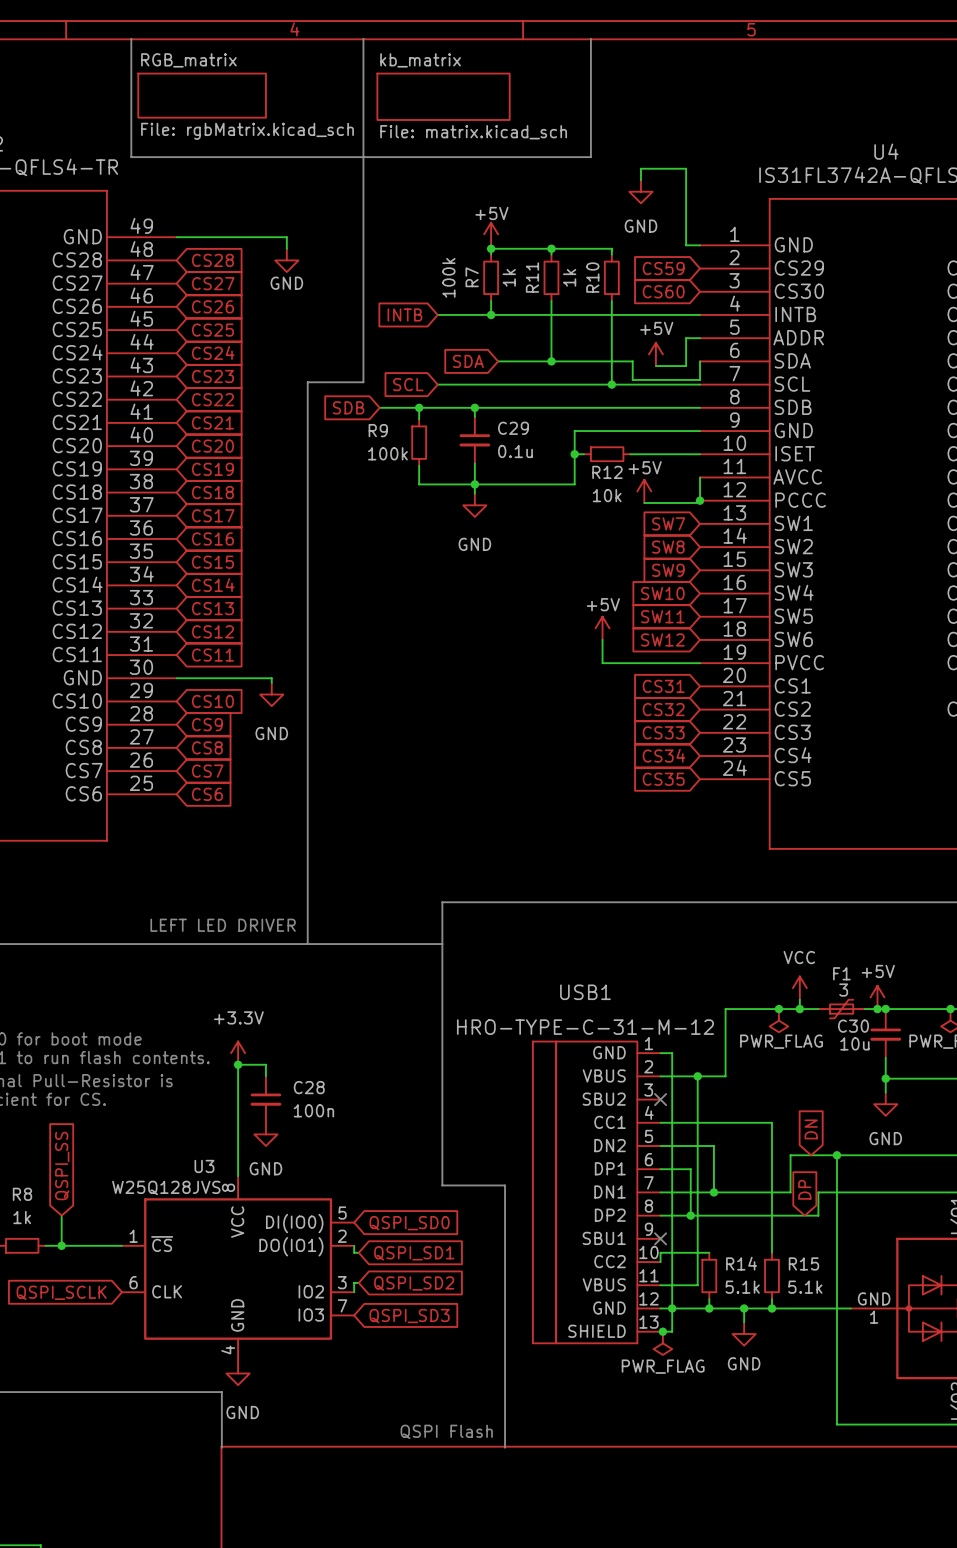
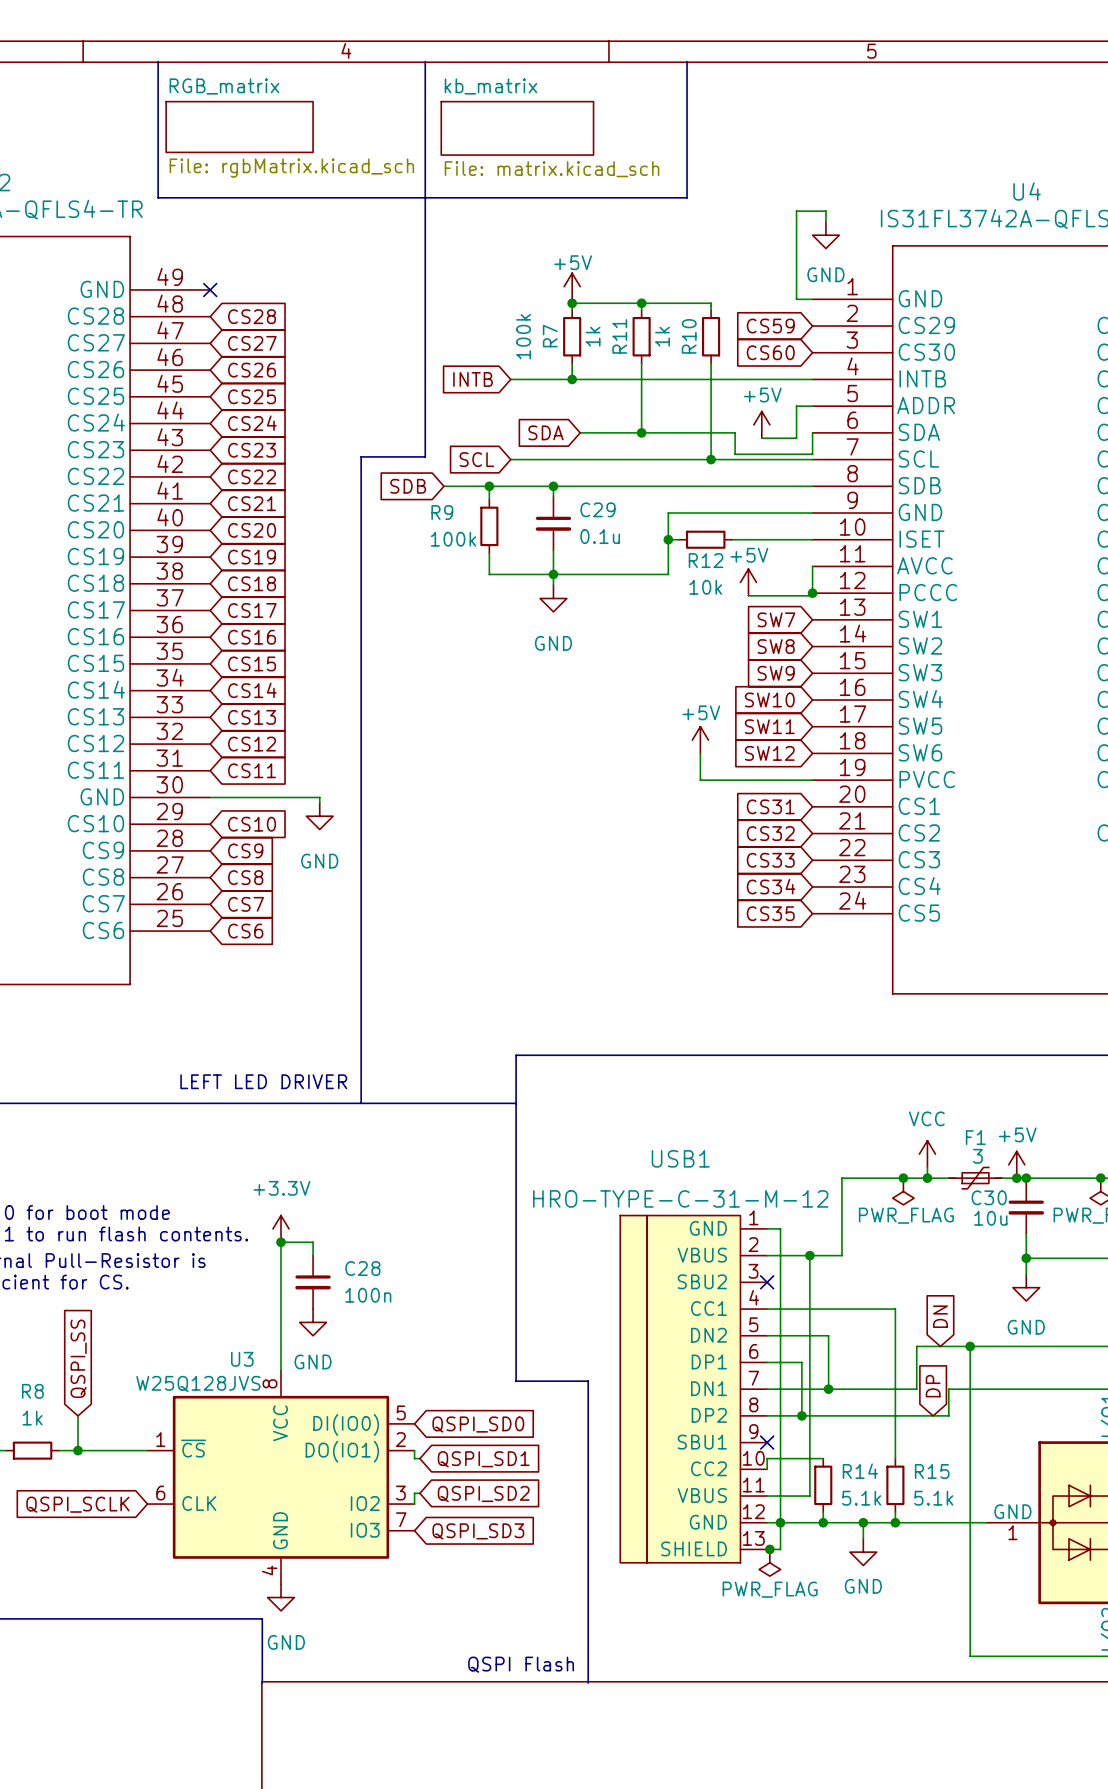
wire: (686, 168) (640, 168) (640, 180) -> (796, 211) (825, 211) (825, 221)
power symbol position: GND (640, 191) -> GND (825, 235)
wire: (176, 237) (286, 237) (286, 248) -> none
no-connect mark: none -> (210, 289)
power symbol: GND (286, 260) -> none

